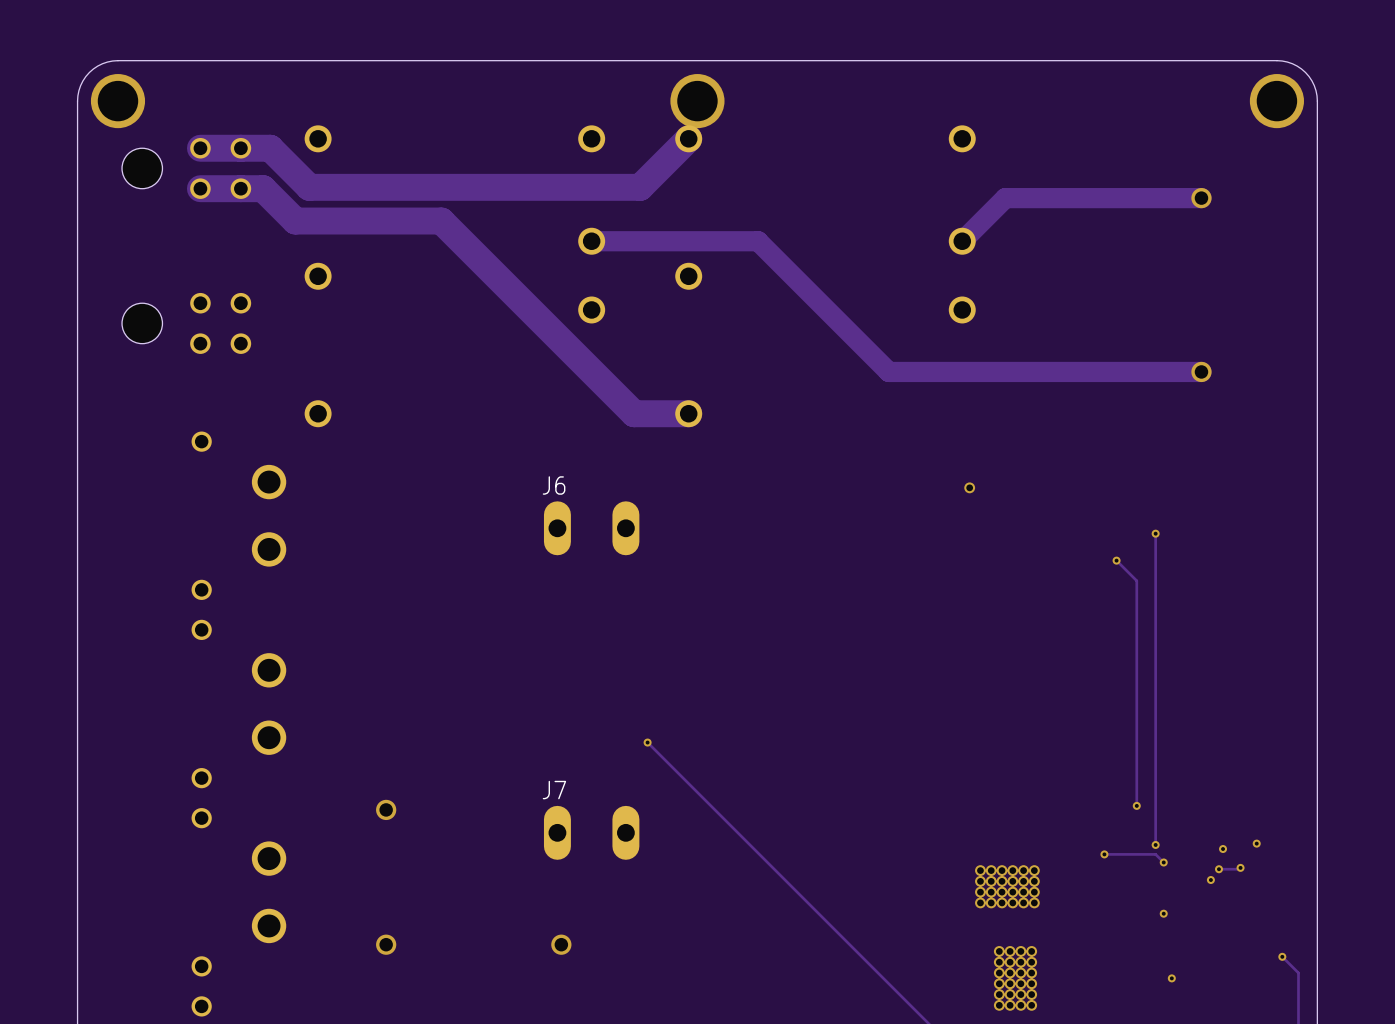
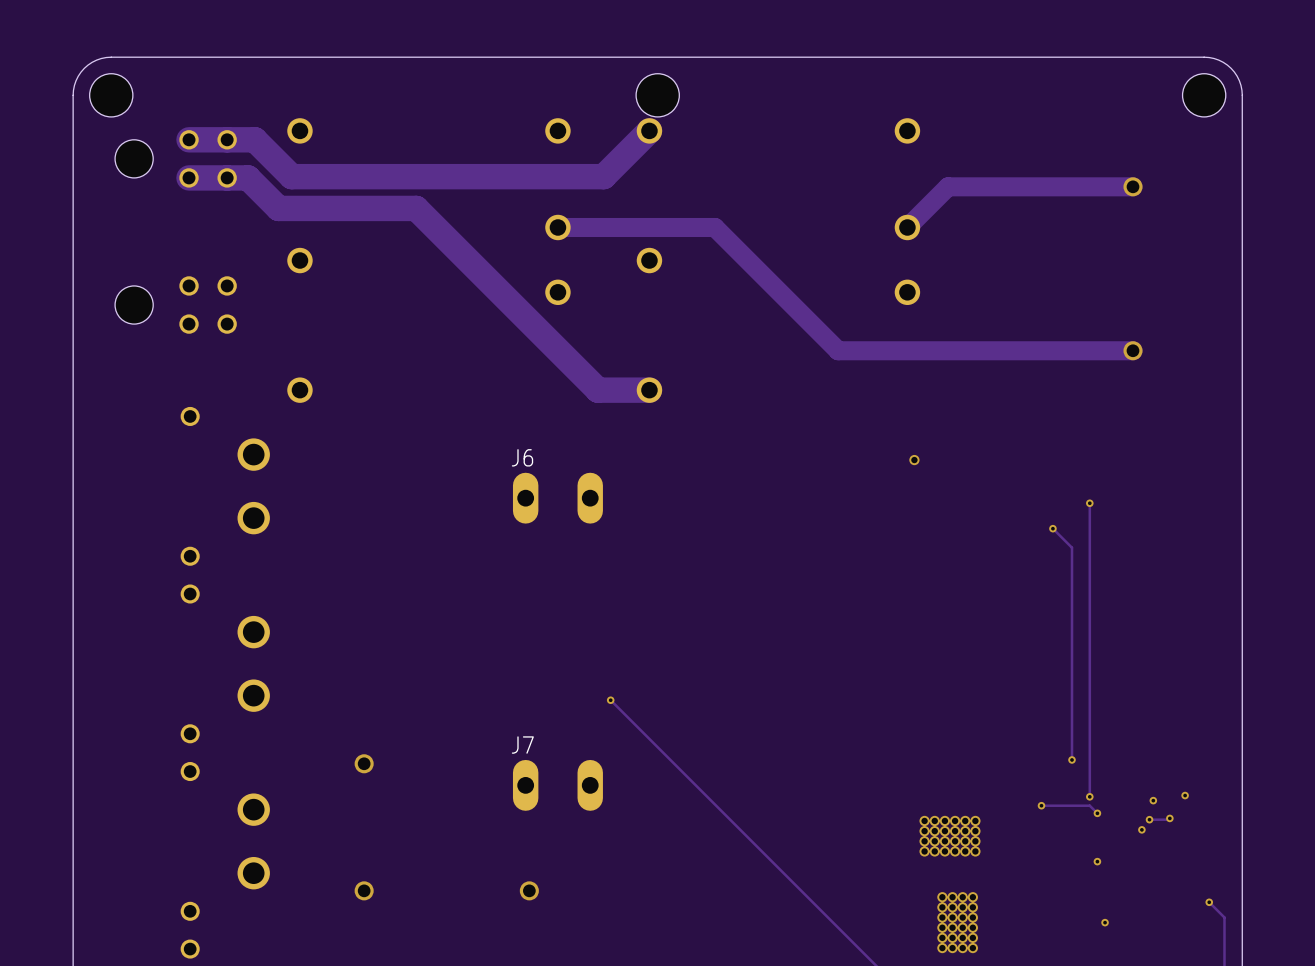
via: (117, 101) -> none
hole: none -> (111, 95)
via: (697, 101) -> none
hole: none -> (657, 95)
via: (1276, 101) -> none
hole: none -> (1204, 95)

